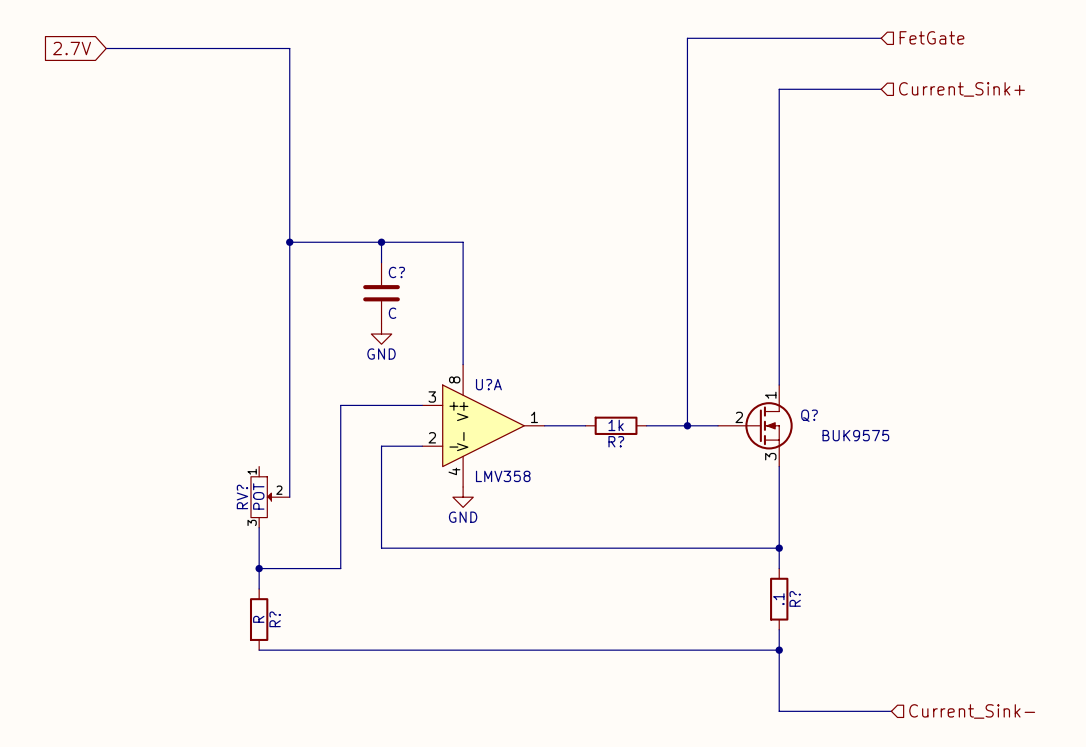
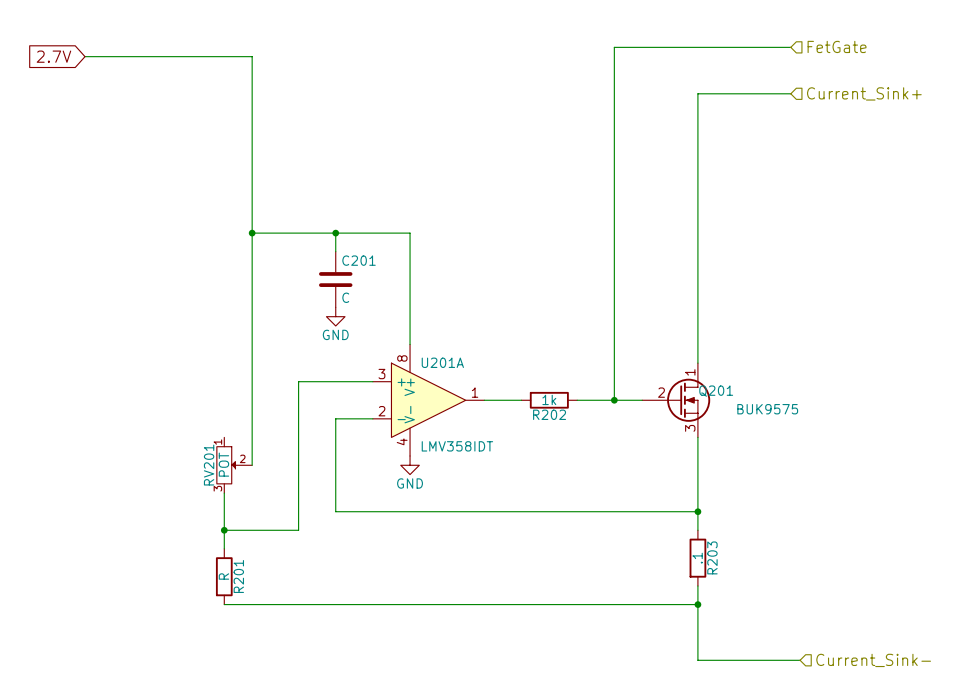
C? name: C? (396, 272) -> C201 (359, 260)
U?A name: U?A (488, 384) -> U201A (442, 362)
Q? name: Q? (809, 415) -> Q201 (716, 391)
R? name: R? (616, 441) -> R202 (549, 414)
U?A value: LMV358 (503, 476) -> LMV358IDT (457, 446)
RV? name: RV? (242, 496) -> RV201 (209, 465)
R? name: R? (795, 598) -> R203 (712, 557)
R? name: R? (275, 619) -> R201 (238, 576)

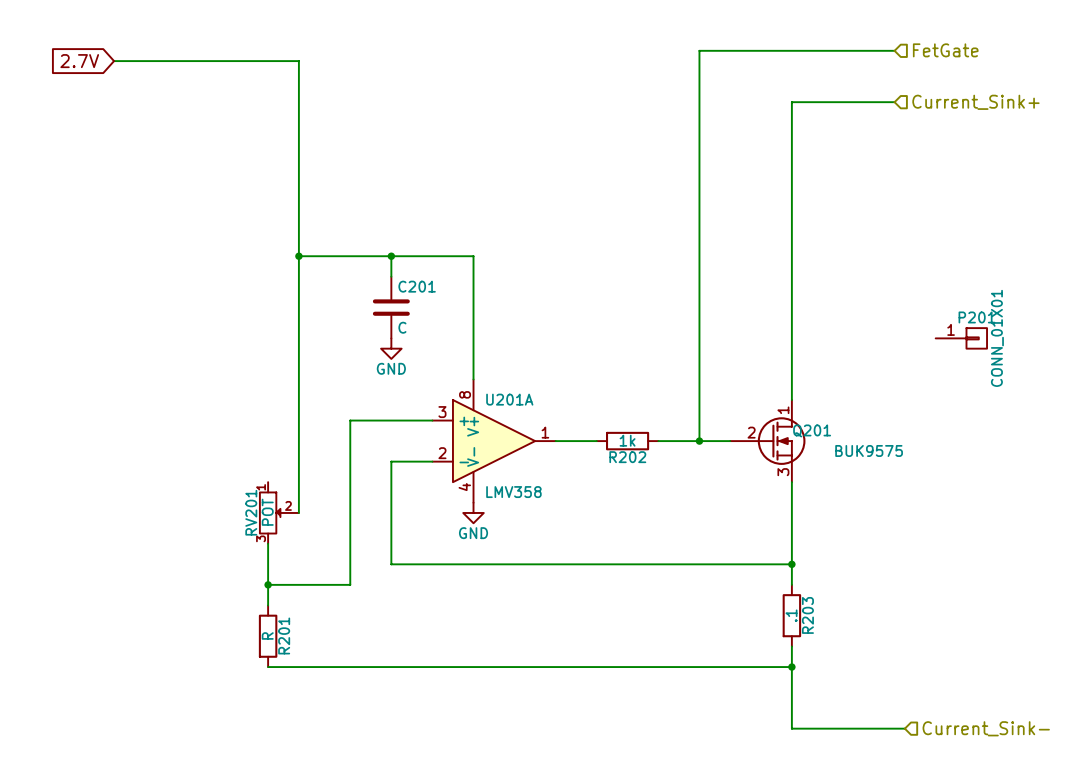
P201: none -> CONN_01X01 (961, 338)
U201A value: LMV358IDT (457, 446) -> LMV358 (513, 492)

